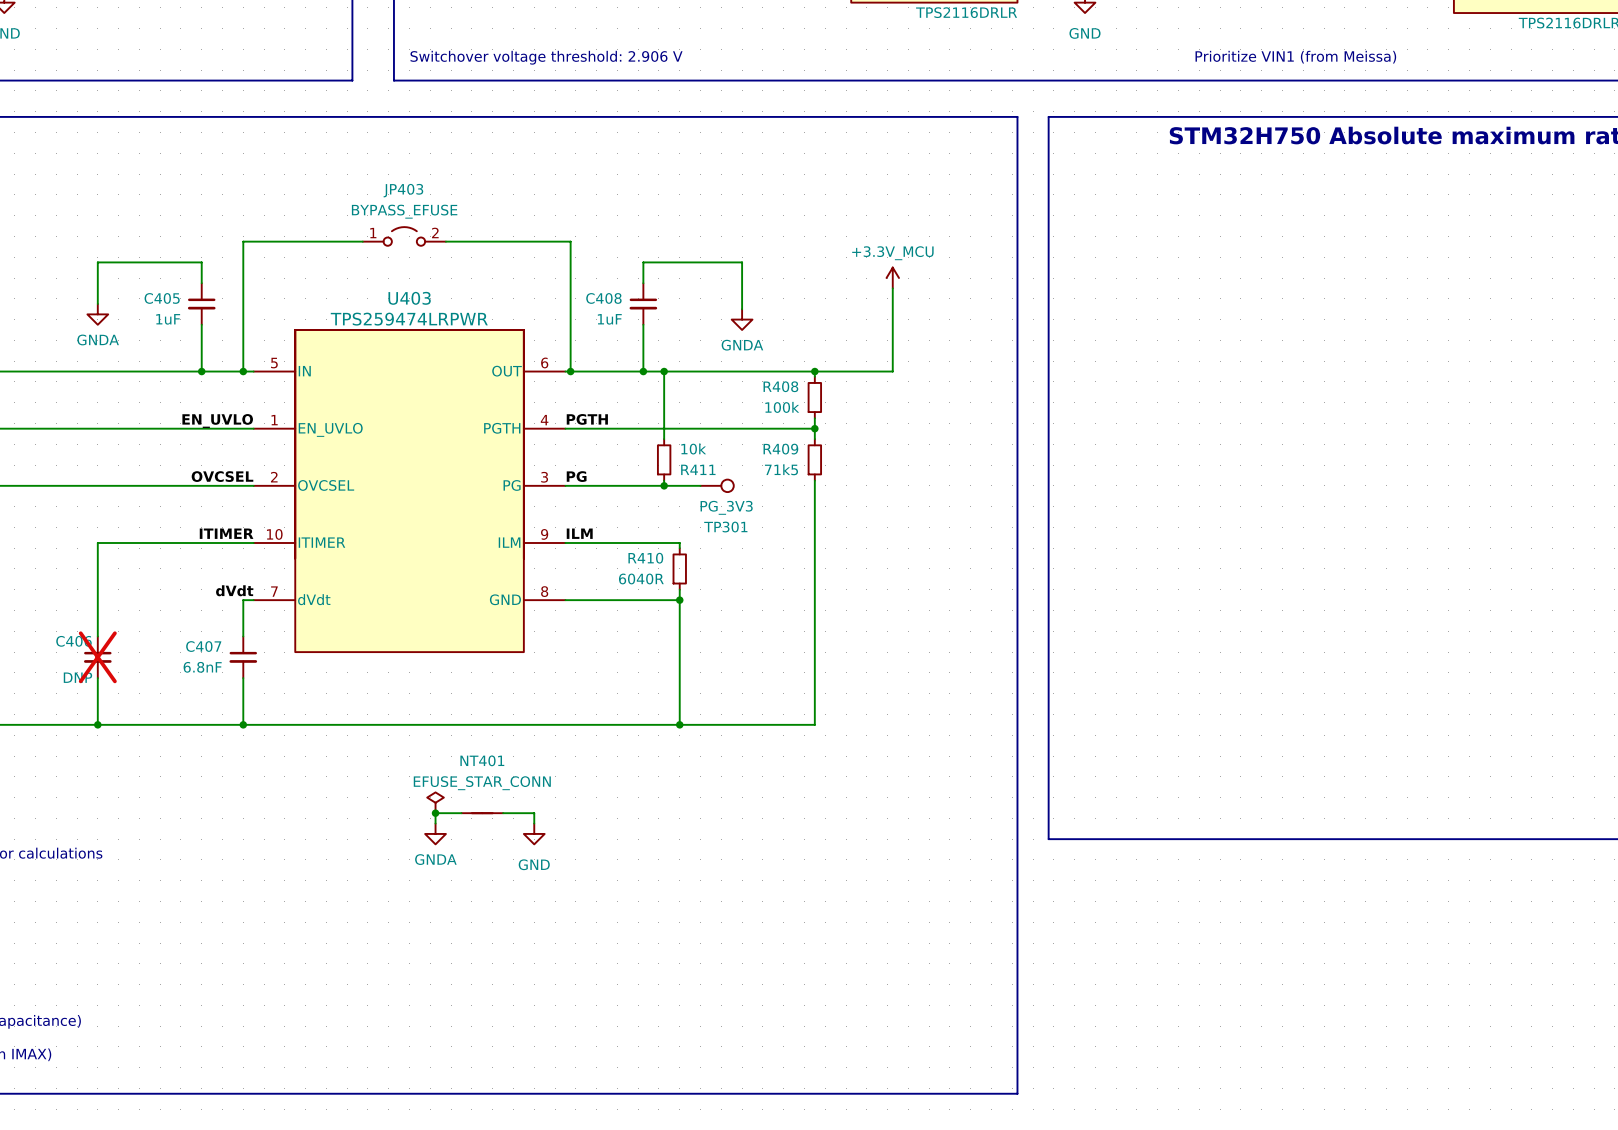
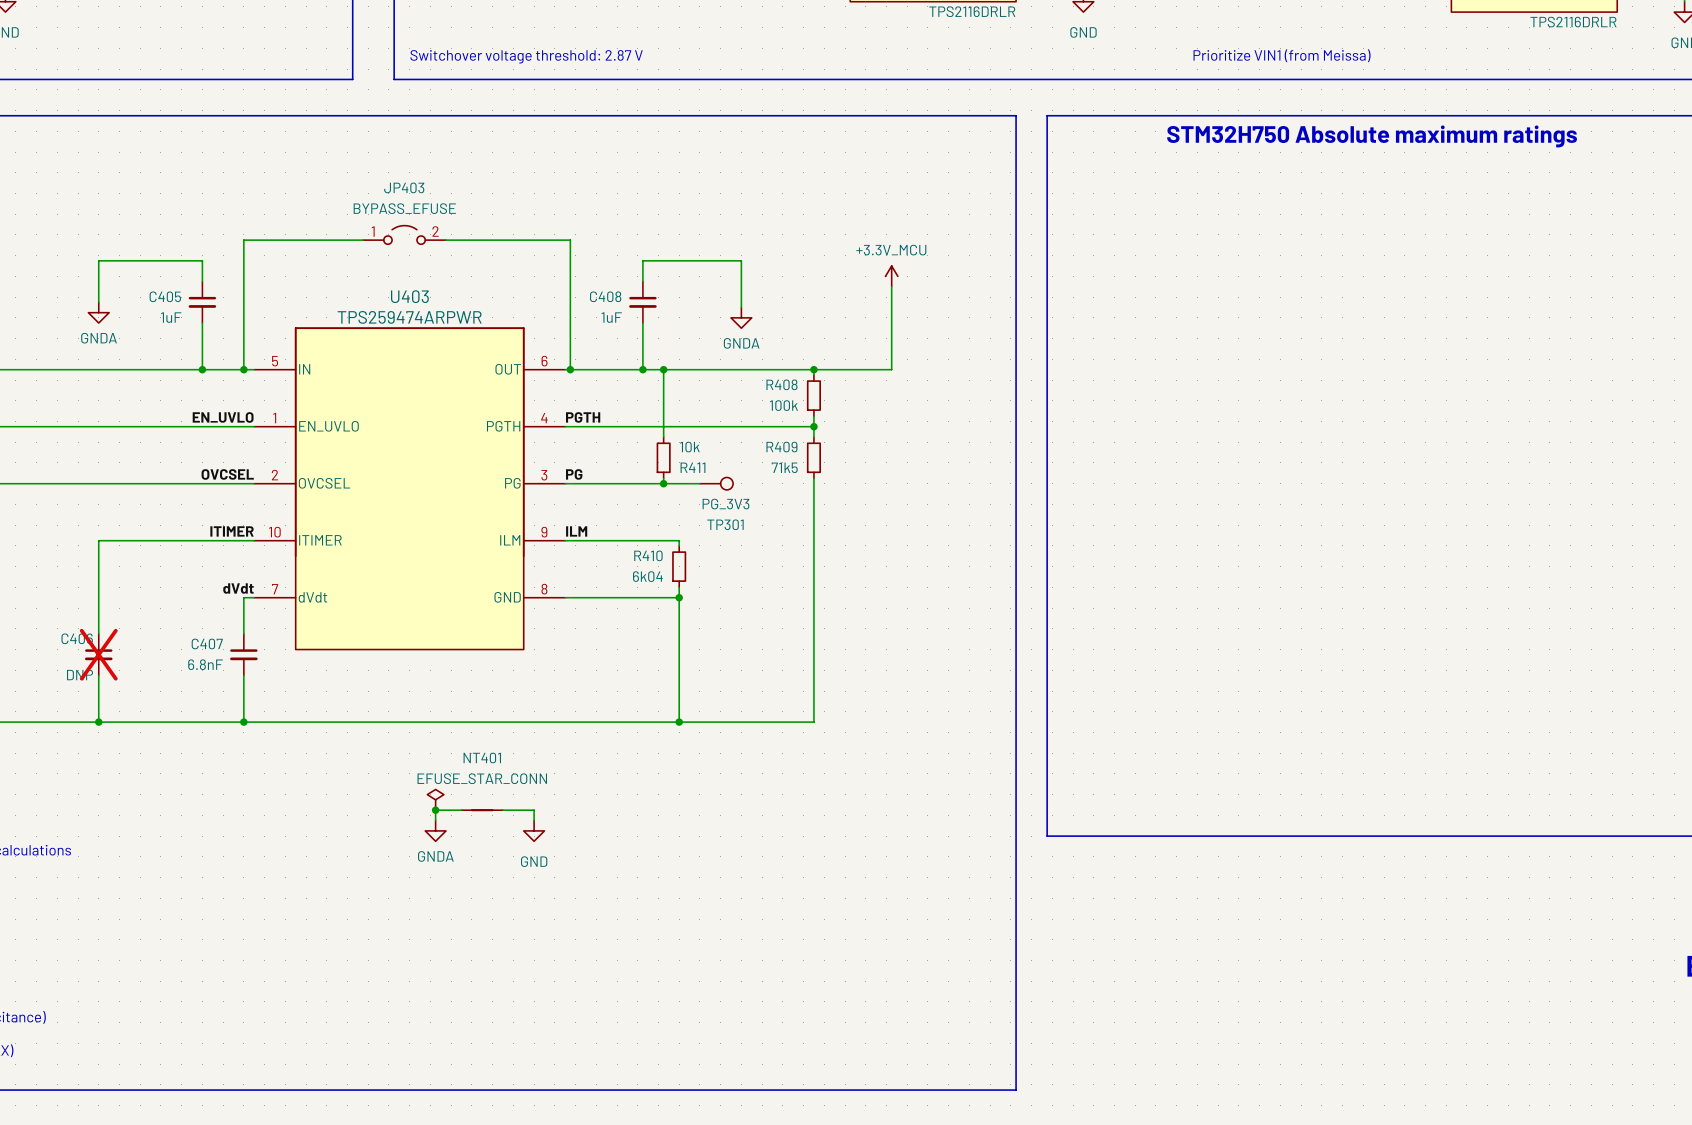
text: Switchover voltage threshold: 2.906 V (546, 57) -> Switchover voltage threshold: 2.87 V (526, 56)
U403 value: TPS259474LRPWR (409, 319) -> TPS259474ARPWR (409, 317)
R410 value: 6040R (641, 578) -> 6k04 (647, 576)

